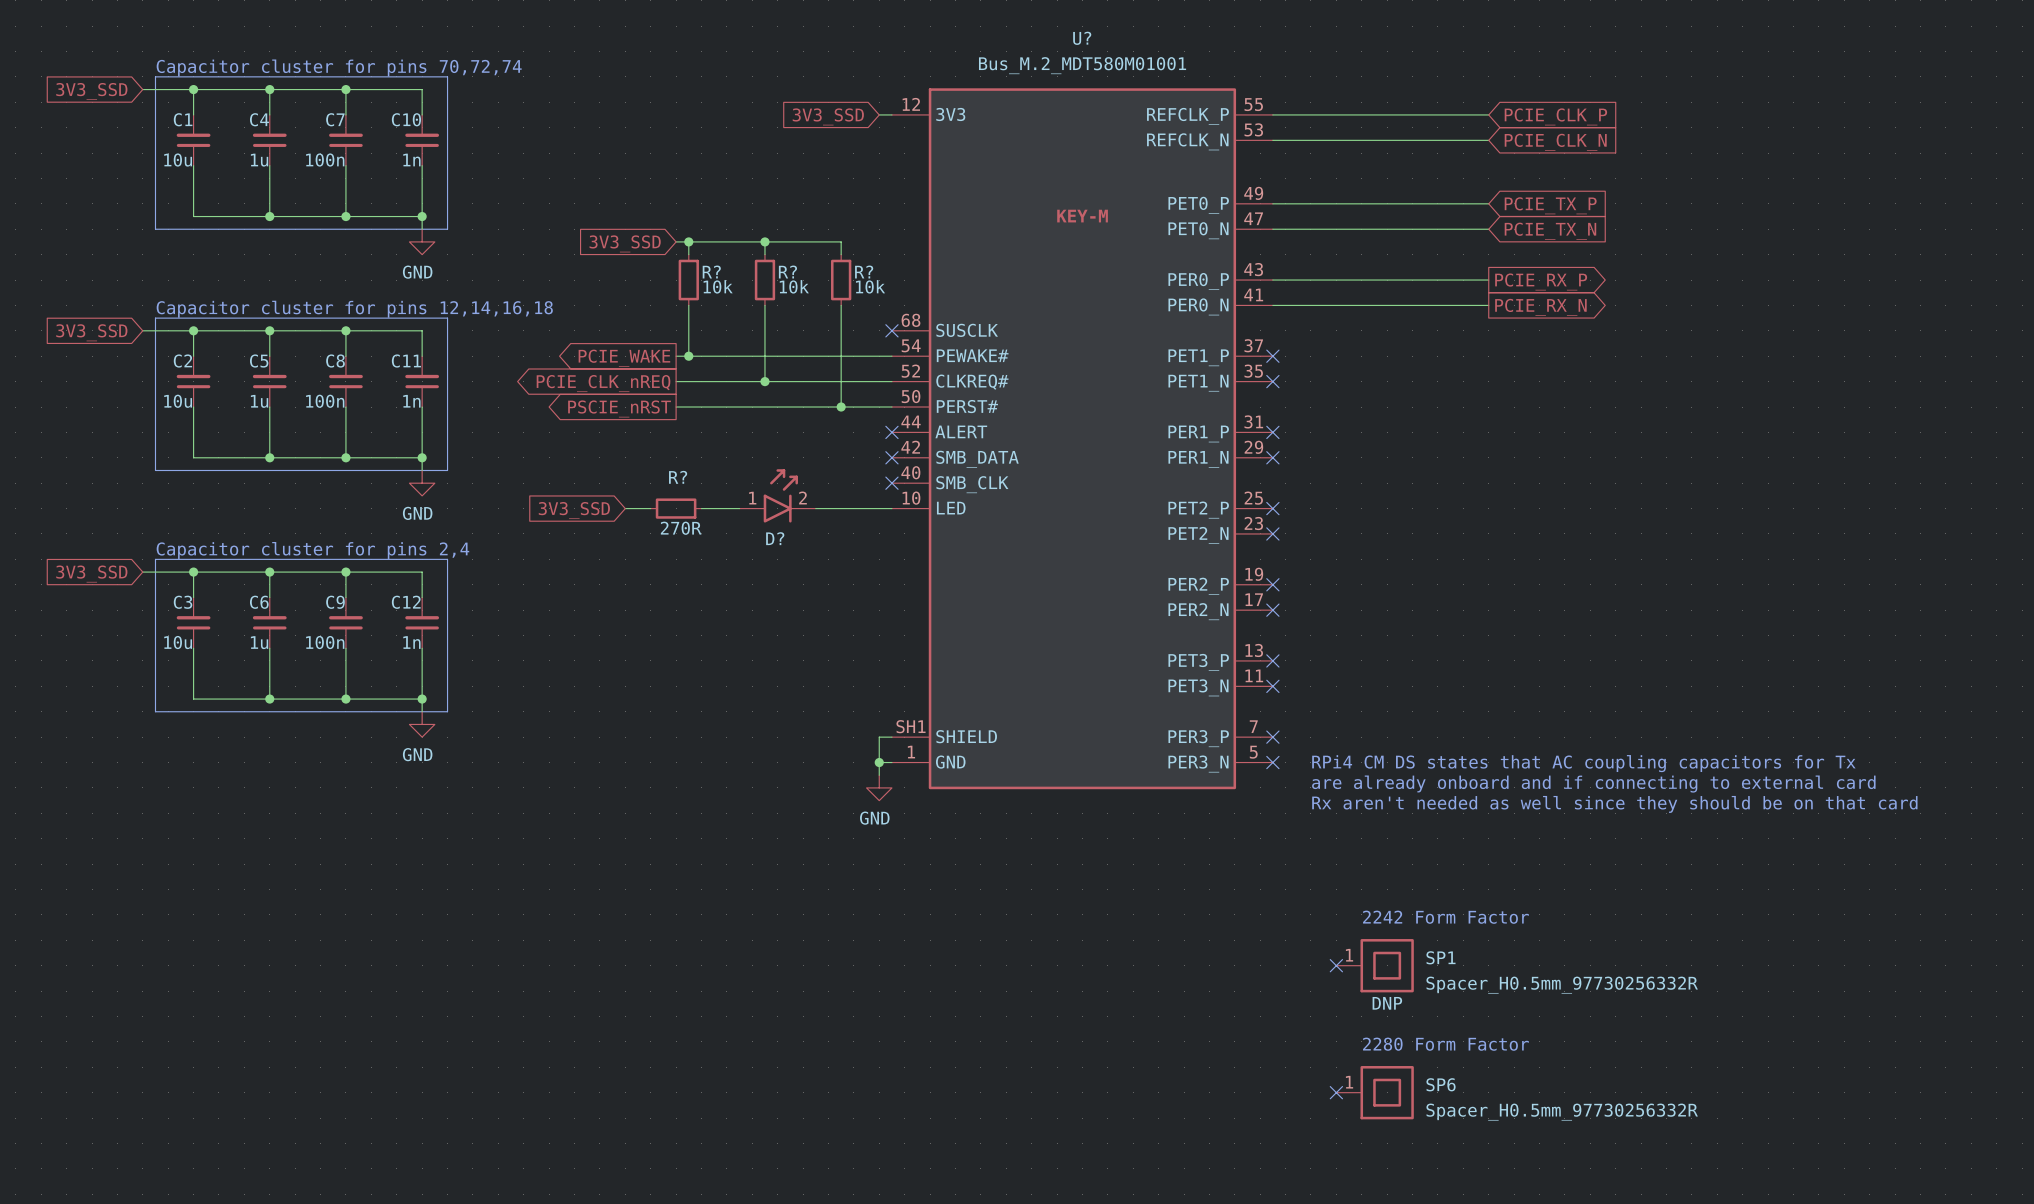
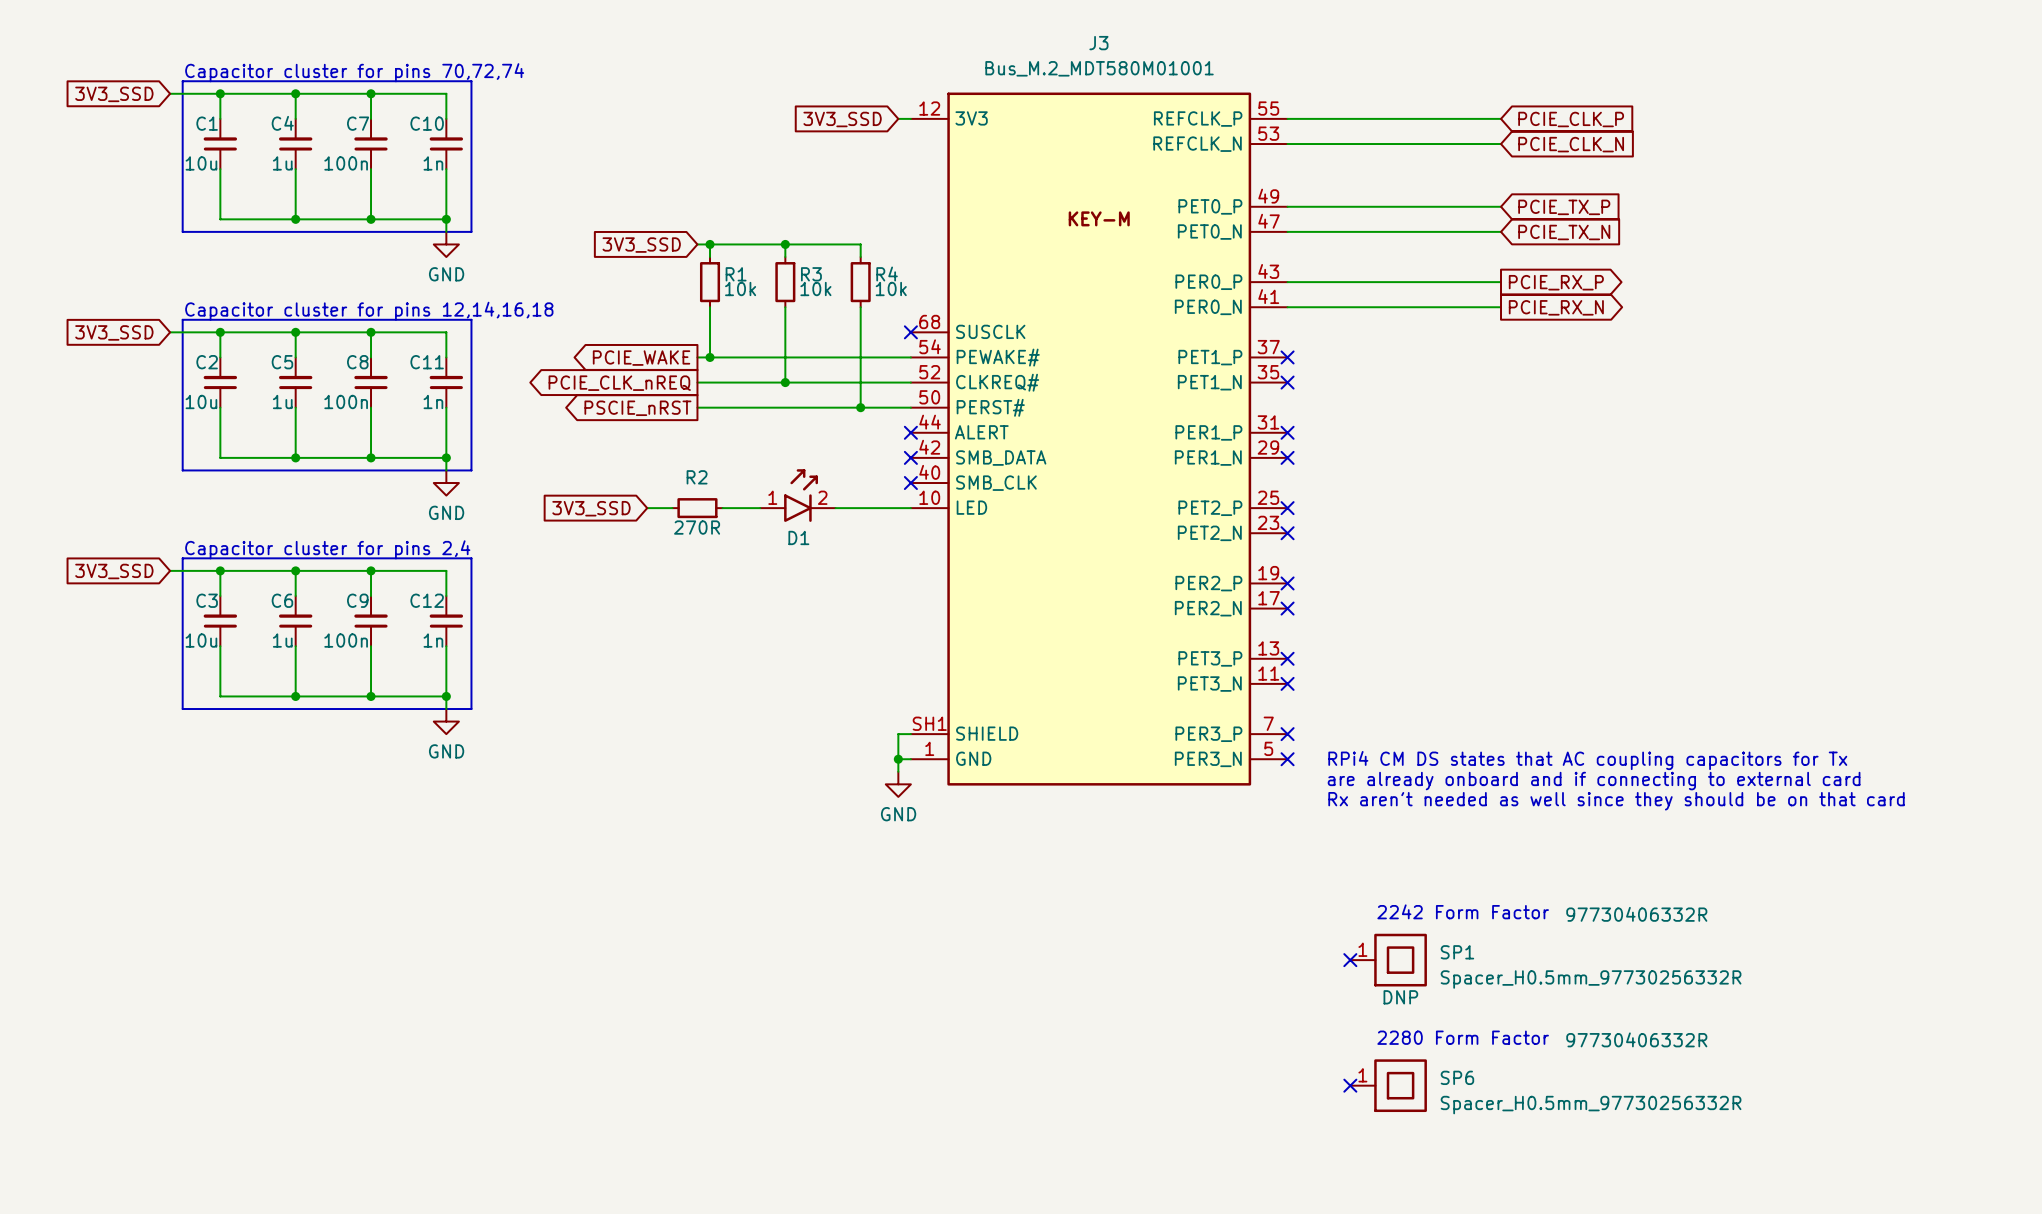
U? name: U? (1082, 38) -> J3 (1098, 43)
R? name: R? (711, 272) -> R1 (736, 274)
R? name: R? (787, 272) -> R3 (811, 274)
R? name: R? (864, 272) -> R4 (887, 274)
R? name: R? (678, 477) -> R2 (697, 477)
D? name: D? (775, 538) -> D1 (798, 537)
SP1 text: none -> 97730406332R (1636, 914)
SP6 text: none -> 97730406332R (1636, 1039)

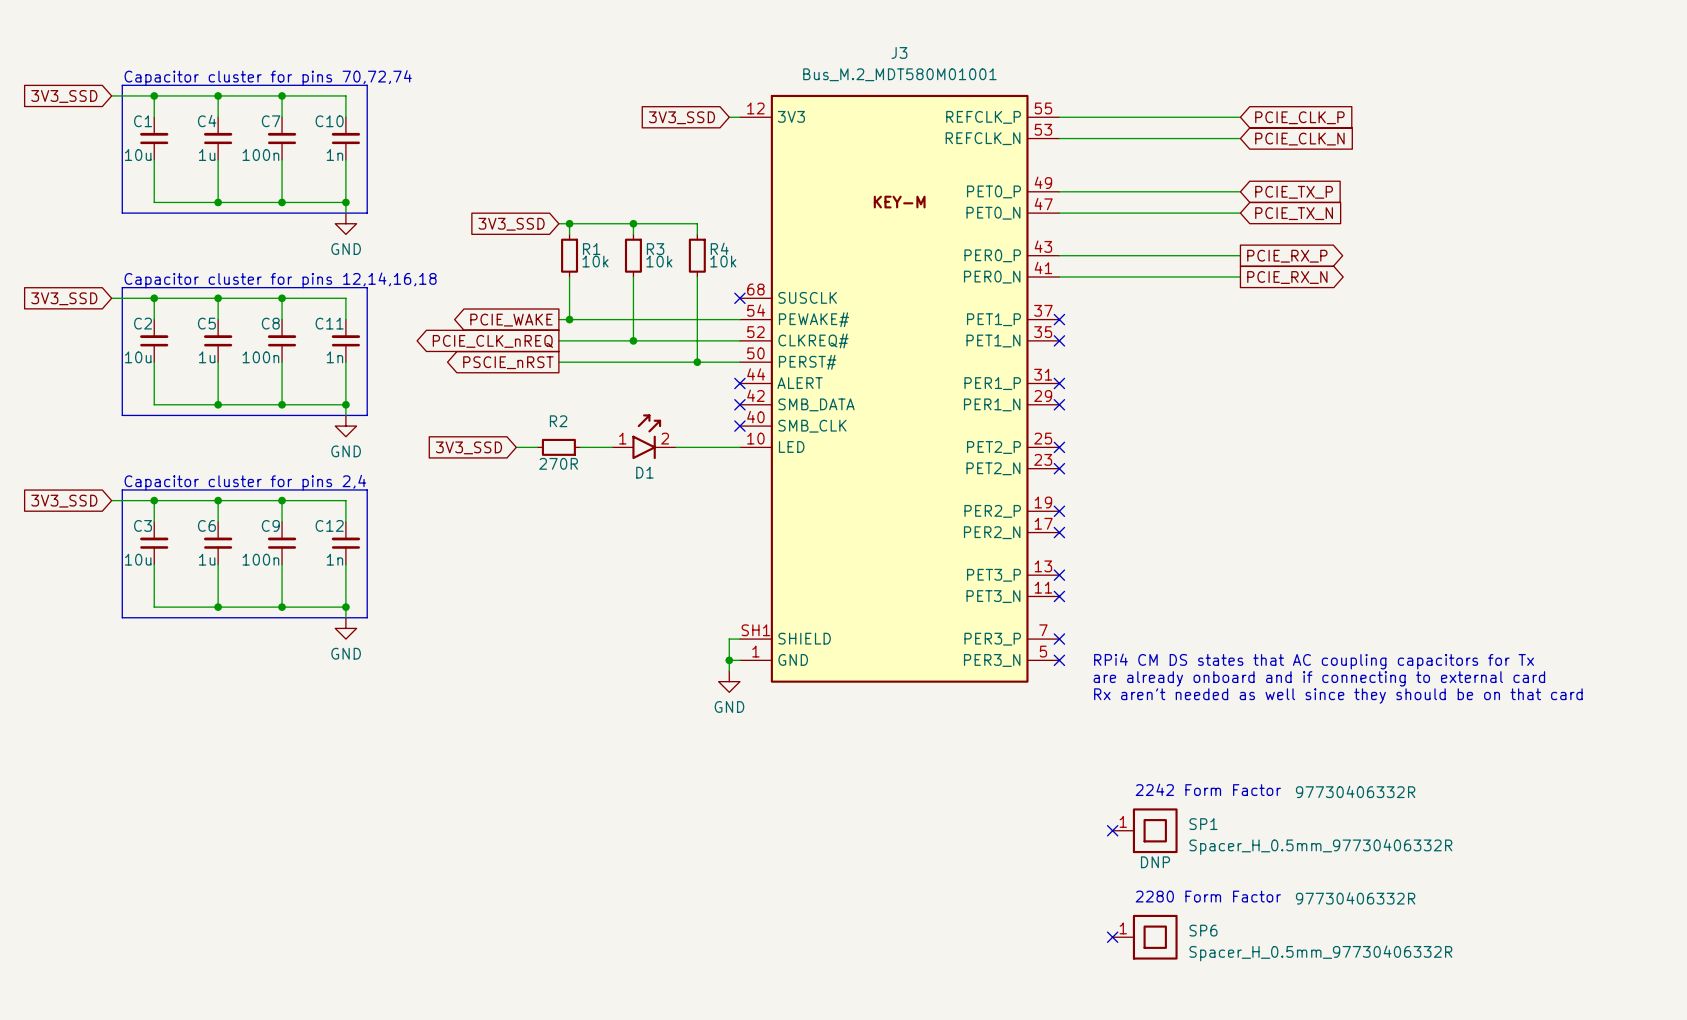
SP1 value: Spacer_H0.5mm_97730256332R (1591, 979) -> Spacer_H_0.5mm_97730406332R (1320, 846)
SP6 value: Spacer_H0.5mm_97730256332R (1591, 1105) -> Spacer_H_0.5mm_97730406332R (1320, 953)

